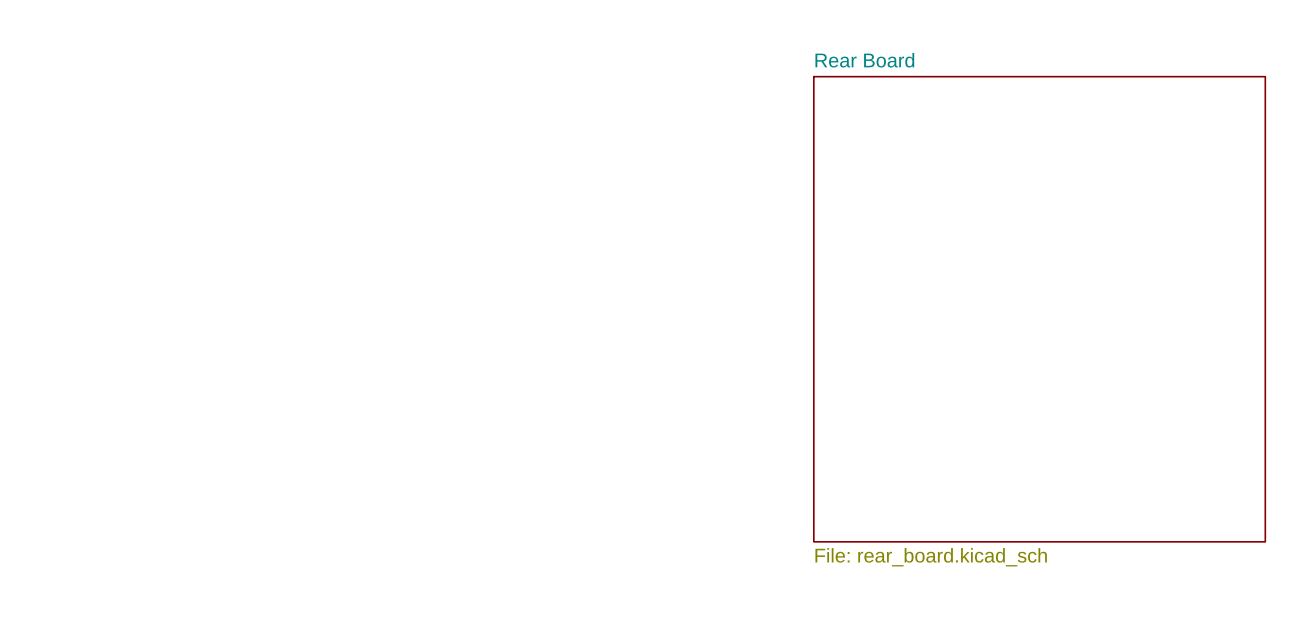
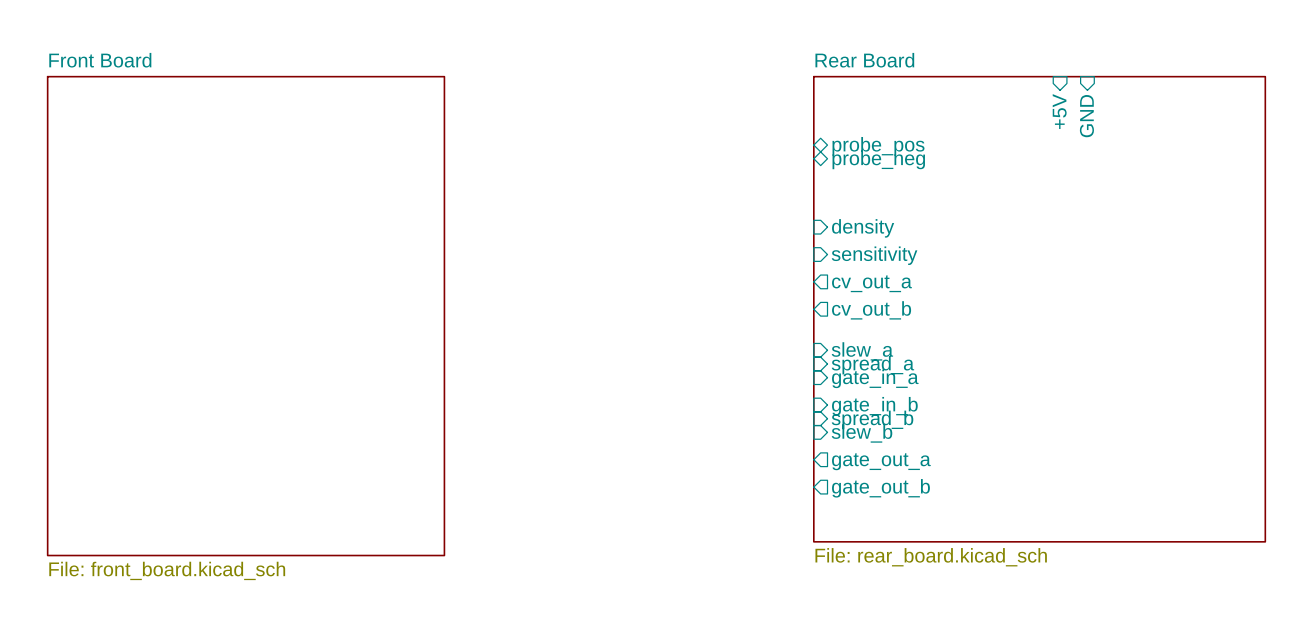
sheet pin: none -> +5V (1059, 111)
sheet pin: none -> GND (1086, 116)
sheet pin: none -> probe_pos (878, 146)
sheet pin: none -> probe_neg (878, 159)
sheet pin: none -> density (863, 228)
sheet pin: none -> sensitivity (874, 255)
sheet pin: none -> cv_out_a (871, 283)
sheet pin: none -> cv_out_b (871, 310)
sheet Front Board: none -> File: front_board.kicad_sch (246, 316)
sheet pin: none -> slew_a (862, 351)
sheet pin: none -> spread_a (872, 365)
sheet pin: none -> gate_in_a (875, 378)
sheet pin: none -> gate_in_b (874, 406)
sheet pin: none -> spread_b (872, 419)
sheet pin: none -> slew_b (862, 433)
sheet pin: none -> gate_out_a (881, 461)
sheet pin: none -> gate_out_b (880, 488)

